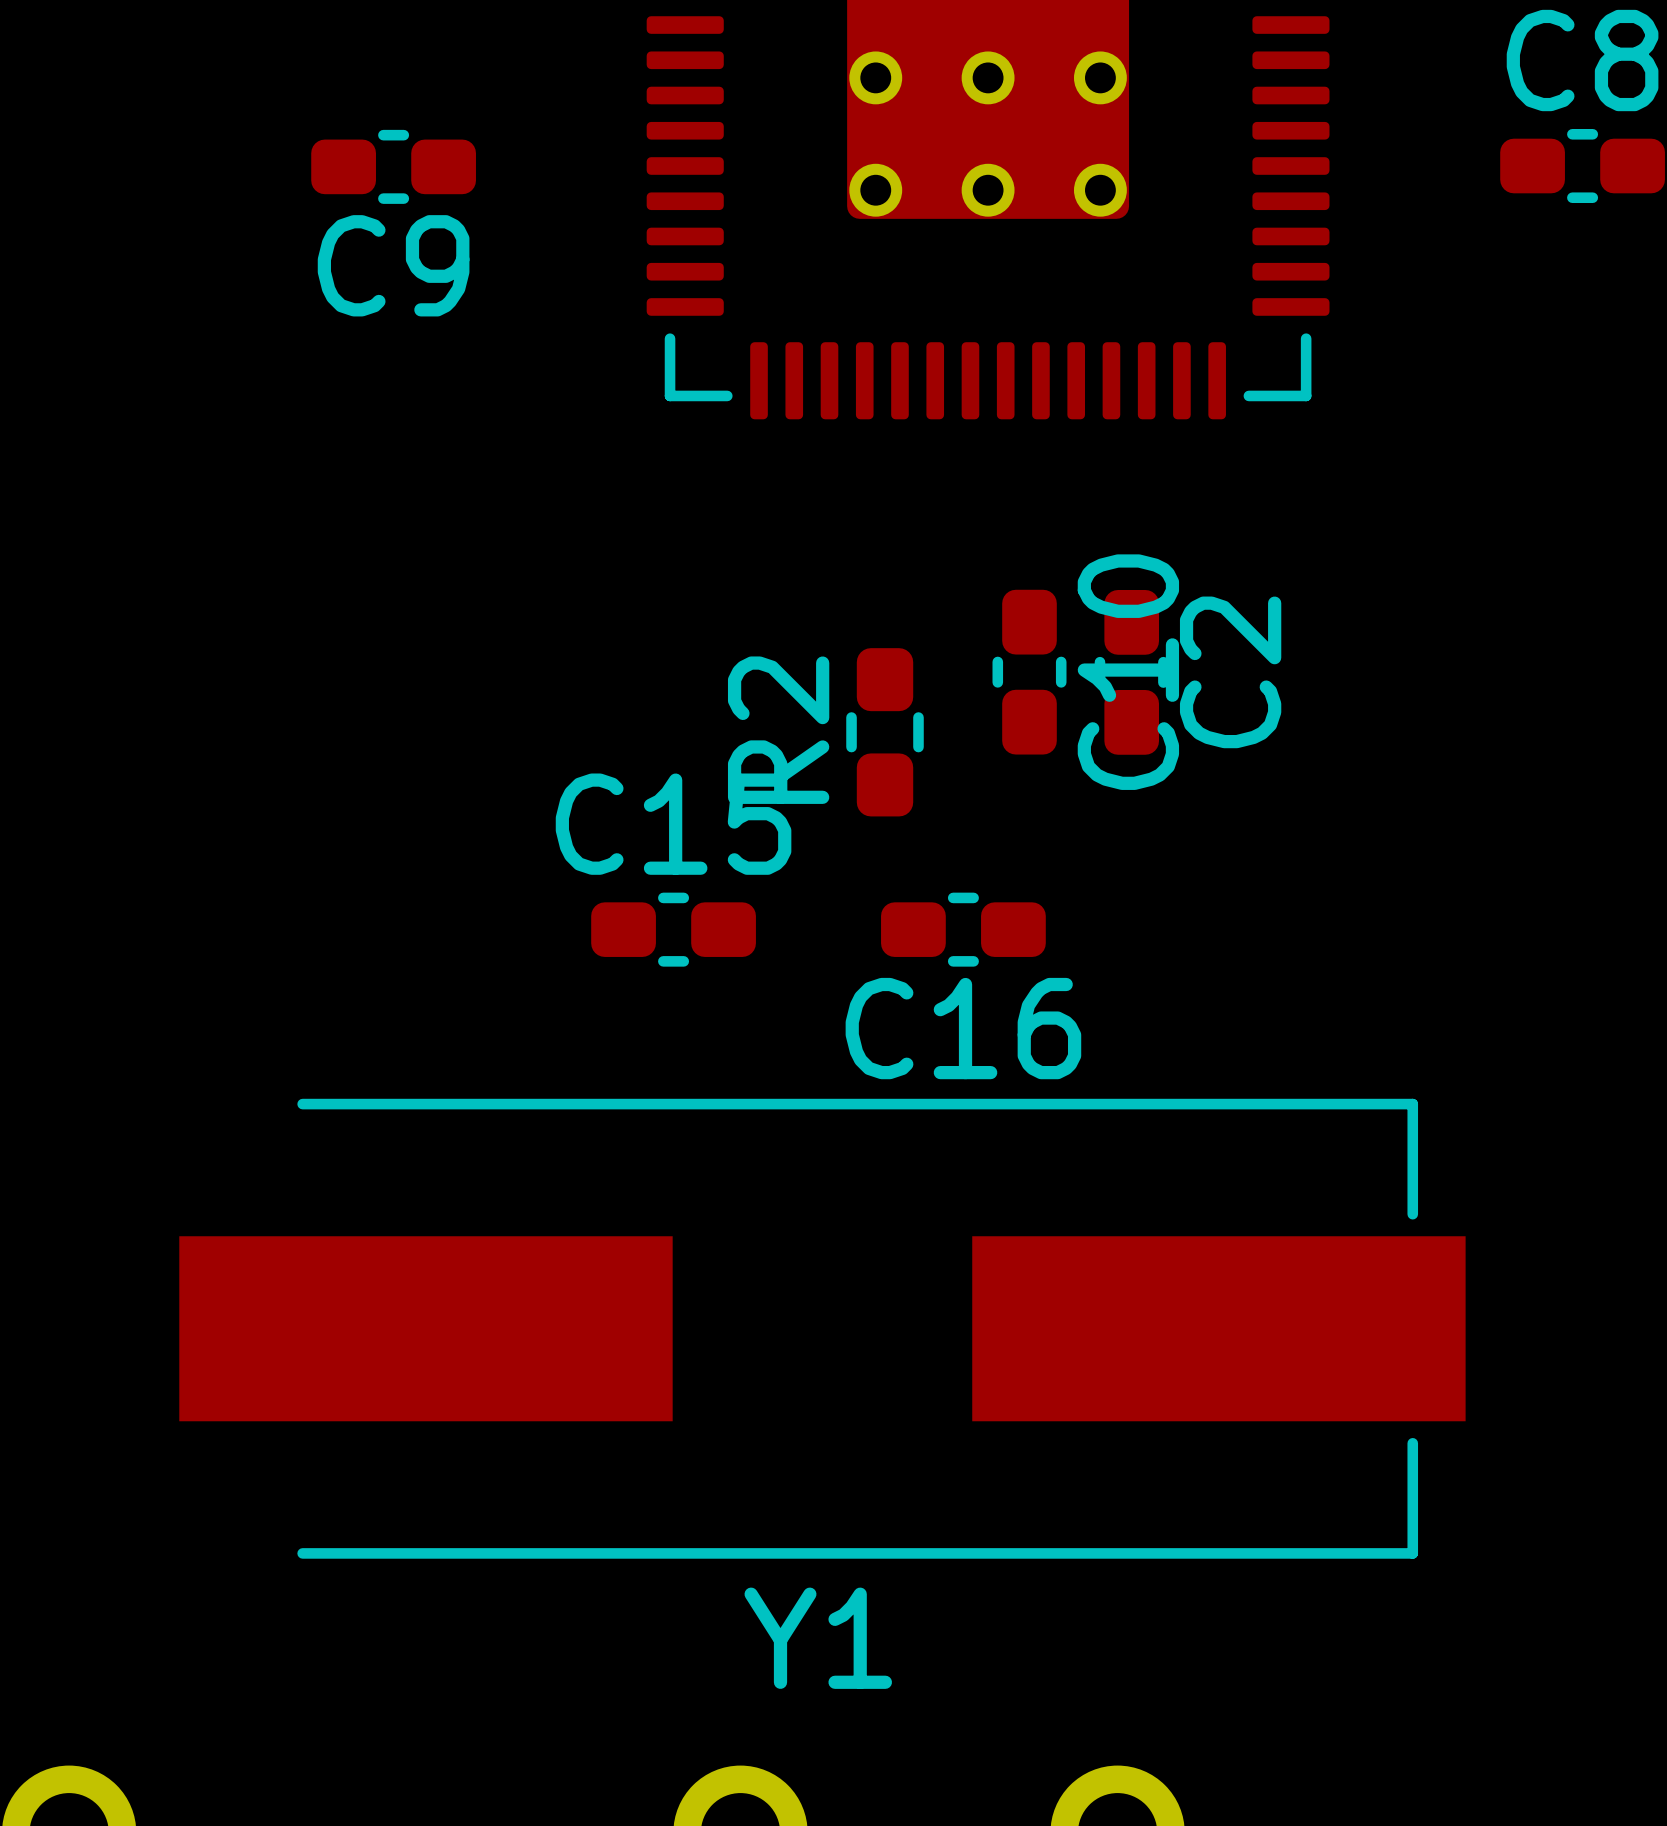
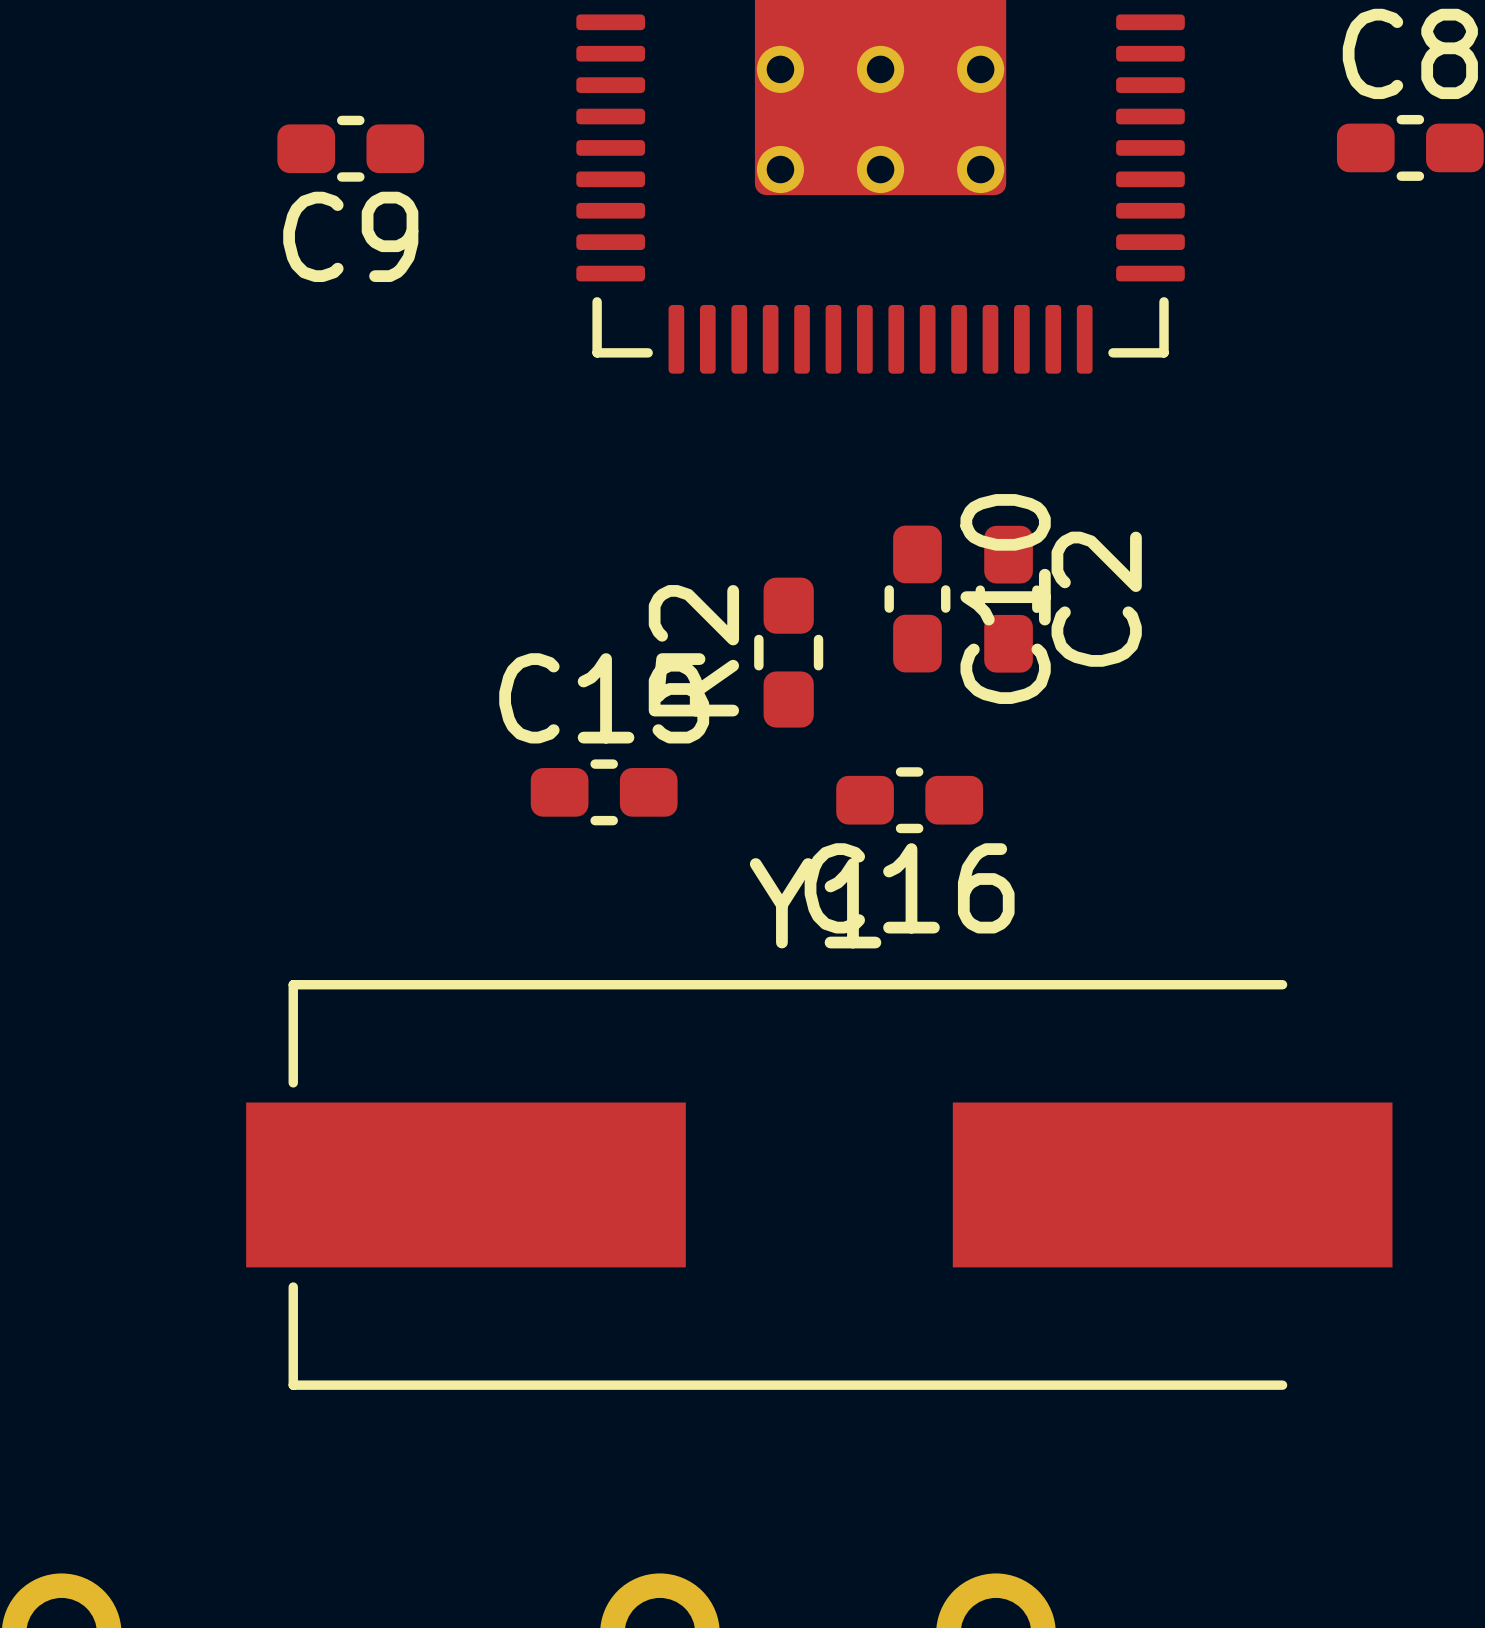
C15 position: (673, 929) -> (604, 792)
C16 position: (963, 929) -> (909, 800)
Y1 rotation: 0° (822, 1328) -> 180° (819, 1184)

